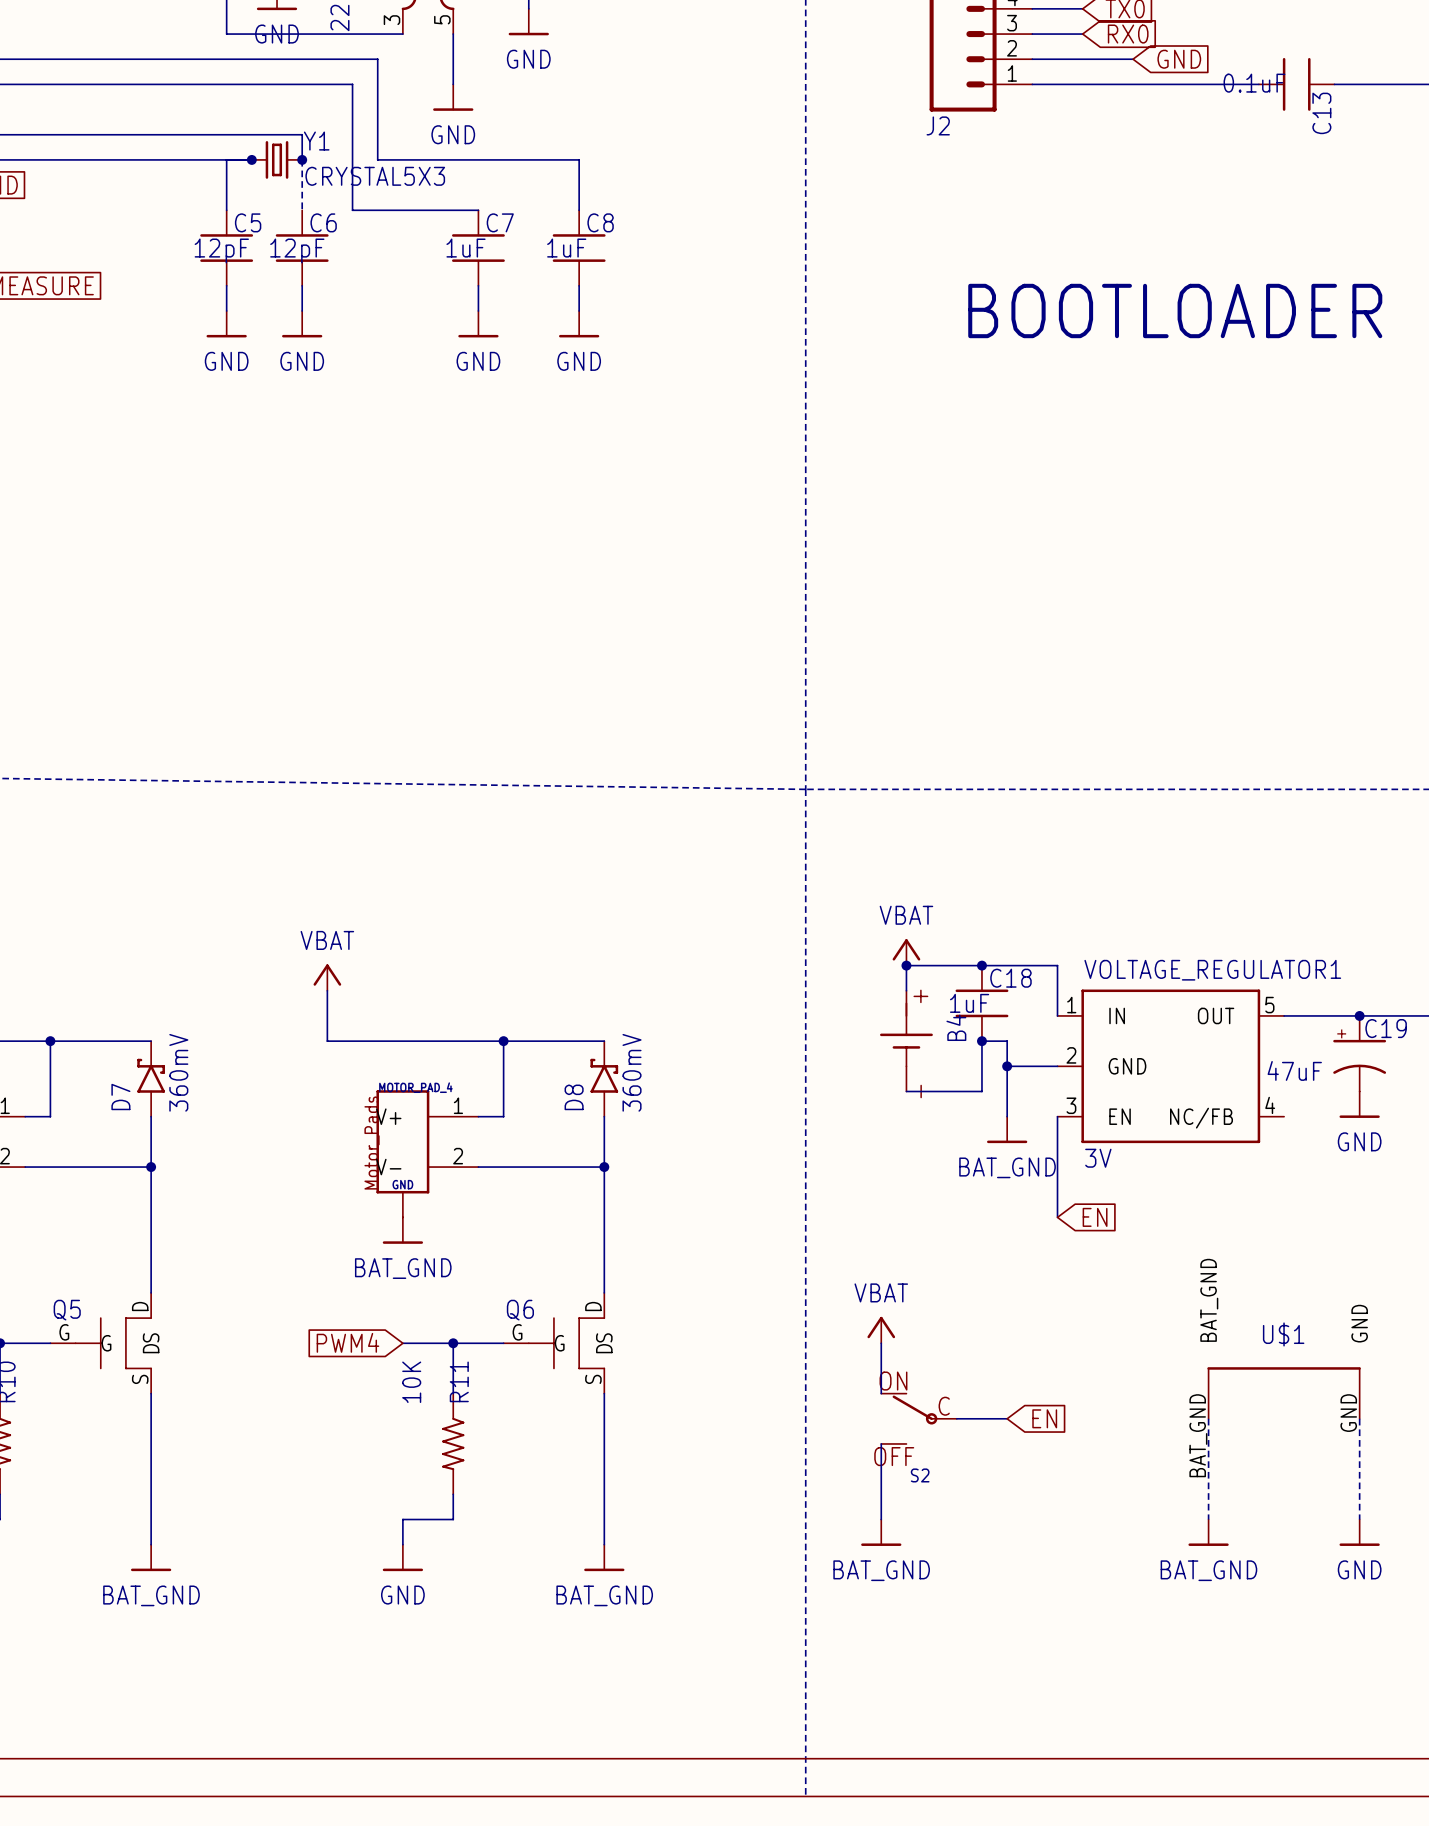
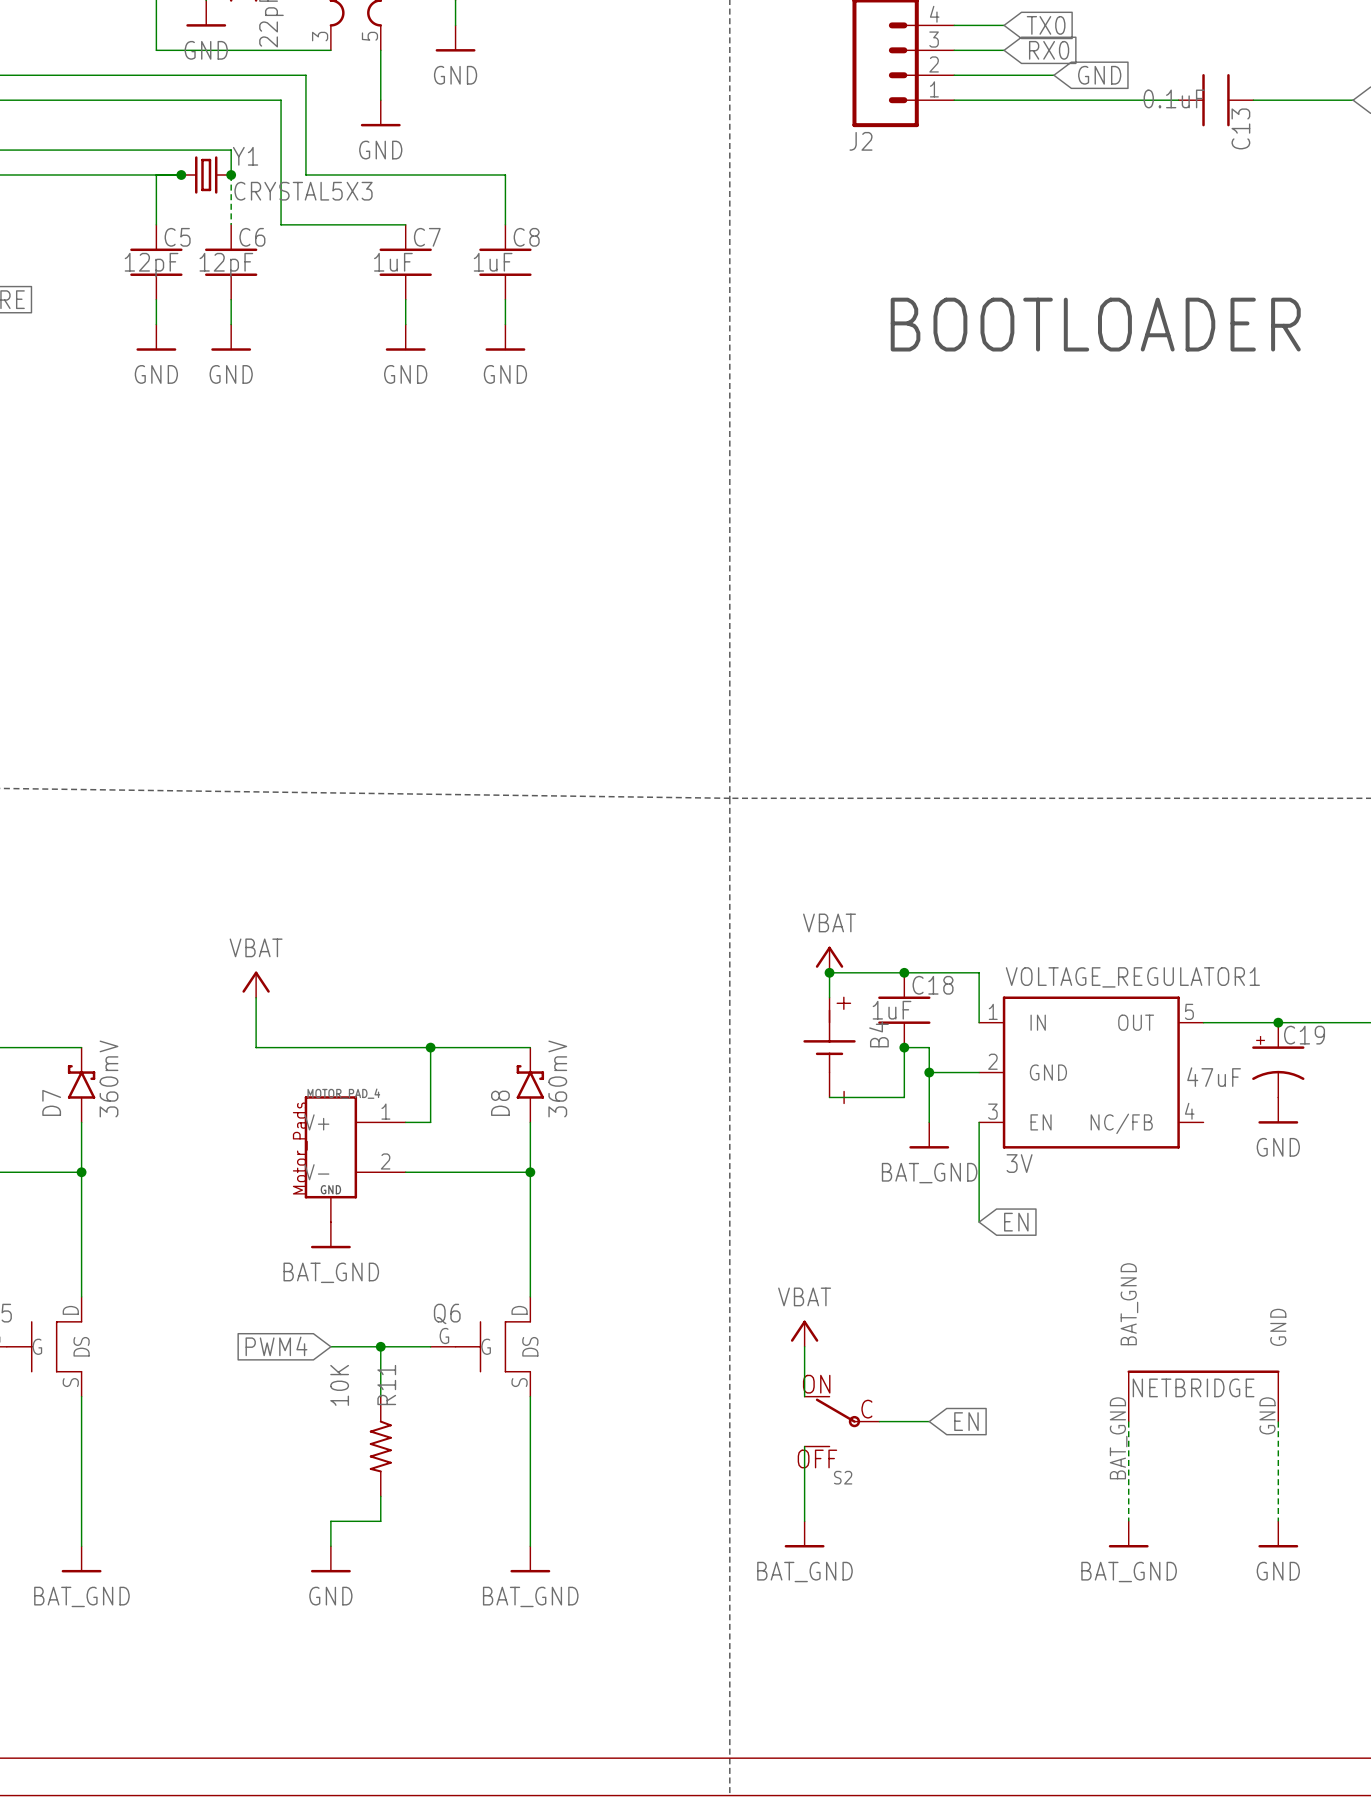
U$1 name: U$1 (1283, 1334) -> NETBRIDGE (1193, 1387)

